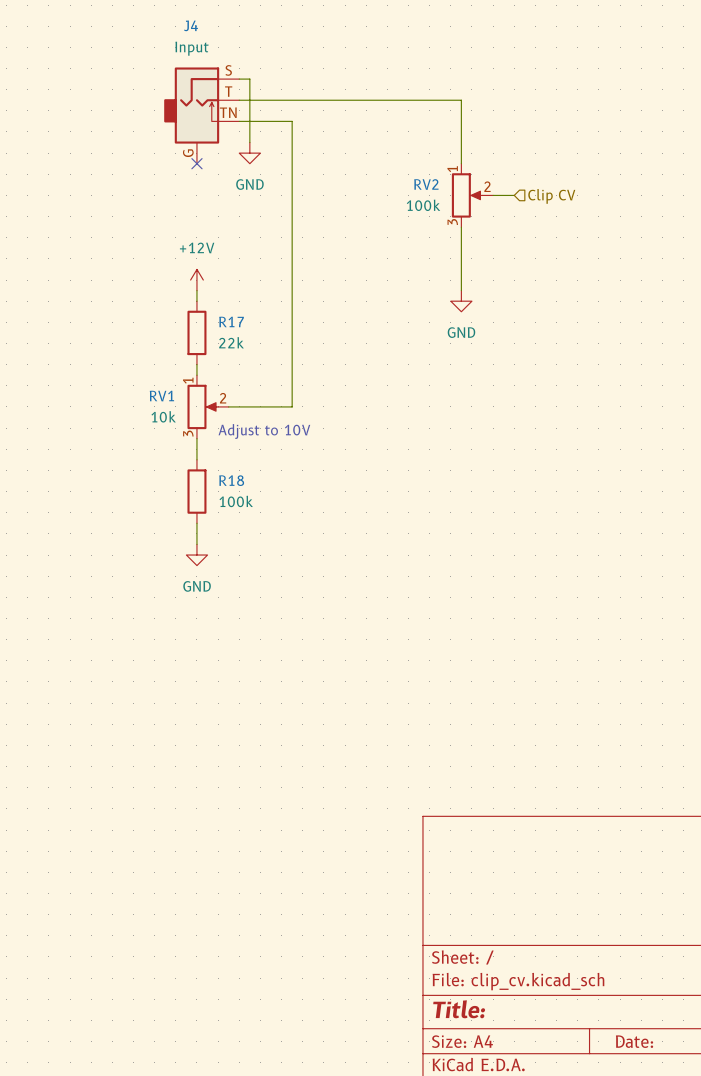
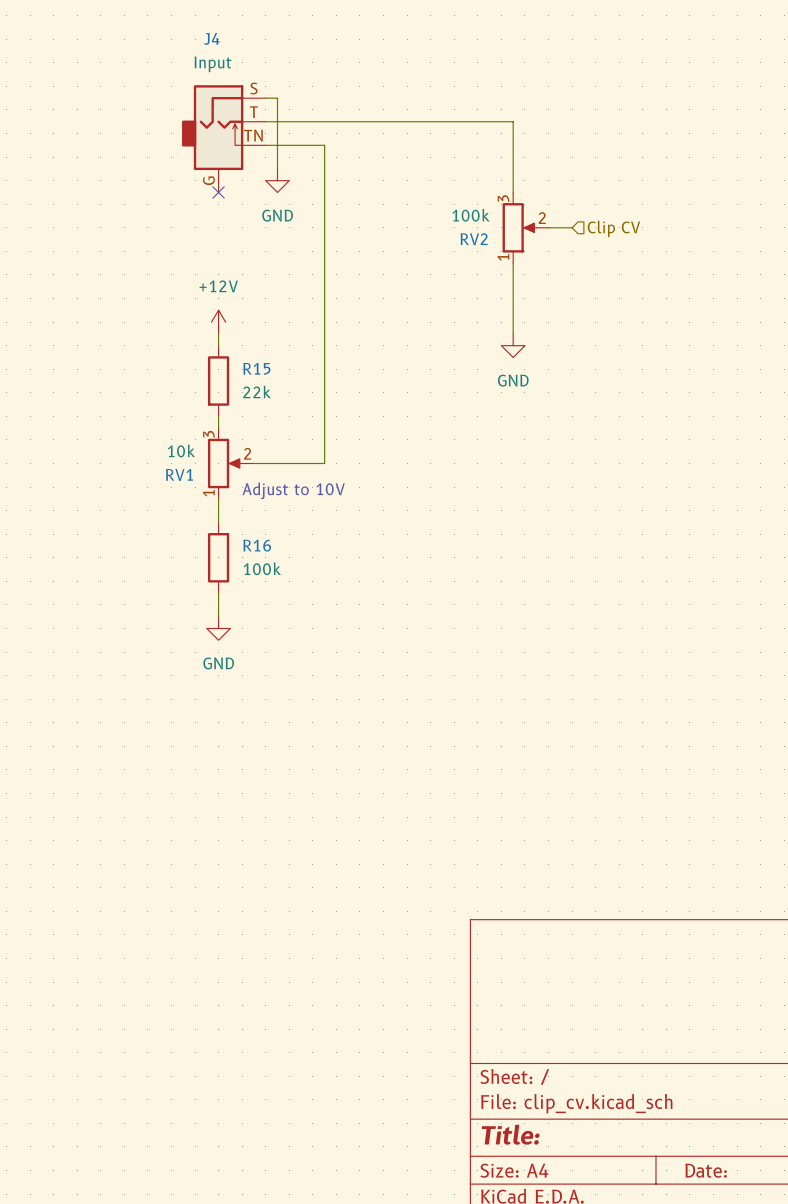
RV2 flip: as is (467, 195) -> up-down (519, 227)
R17 name: R17 (231, 321) -> R15 (256, 368)
RV1 flip: as is (202, 406) -> up-down (225, 463)
R18 name: R18 (231, 480) -> R16 (257, 545)

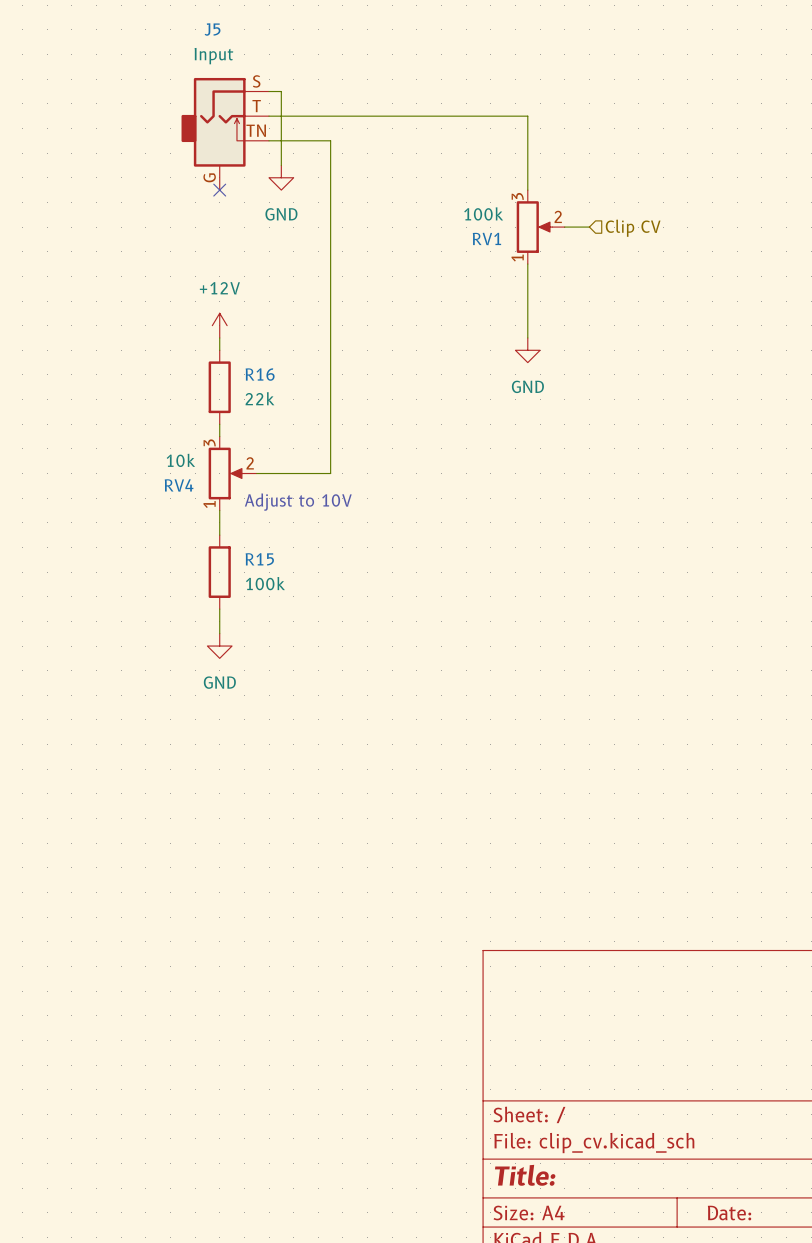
J4 name: J4 (211, 38) -> J5 (212, 29)
RV2 name: RV2 (474, 239) -> RV1 (486, 239)
R15 name: R15 (256, 368) -> R16 (260, 374)
RV1 name: RV1 (179, 474) -> RV4 (179, 485)
R16 name: R16 (257, 545) -> R15 (259, 559)

